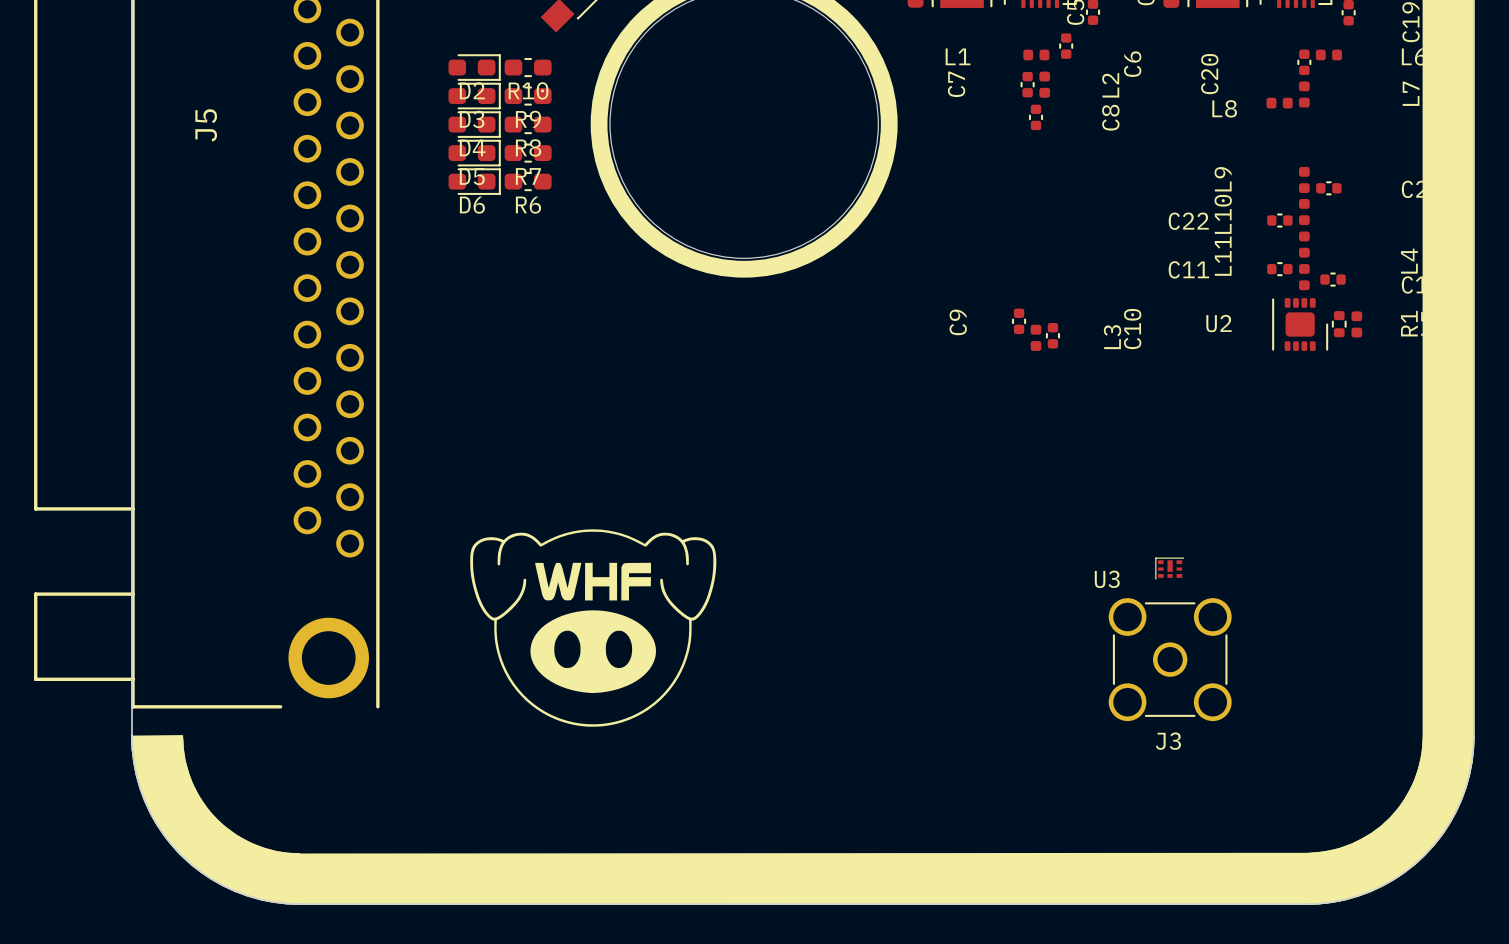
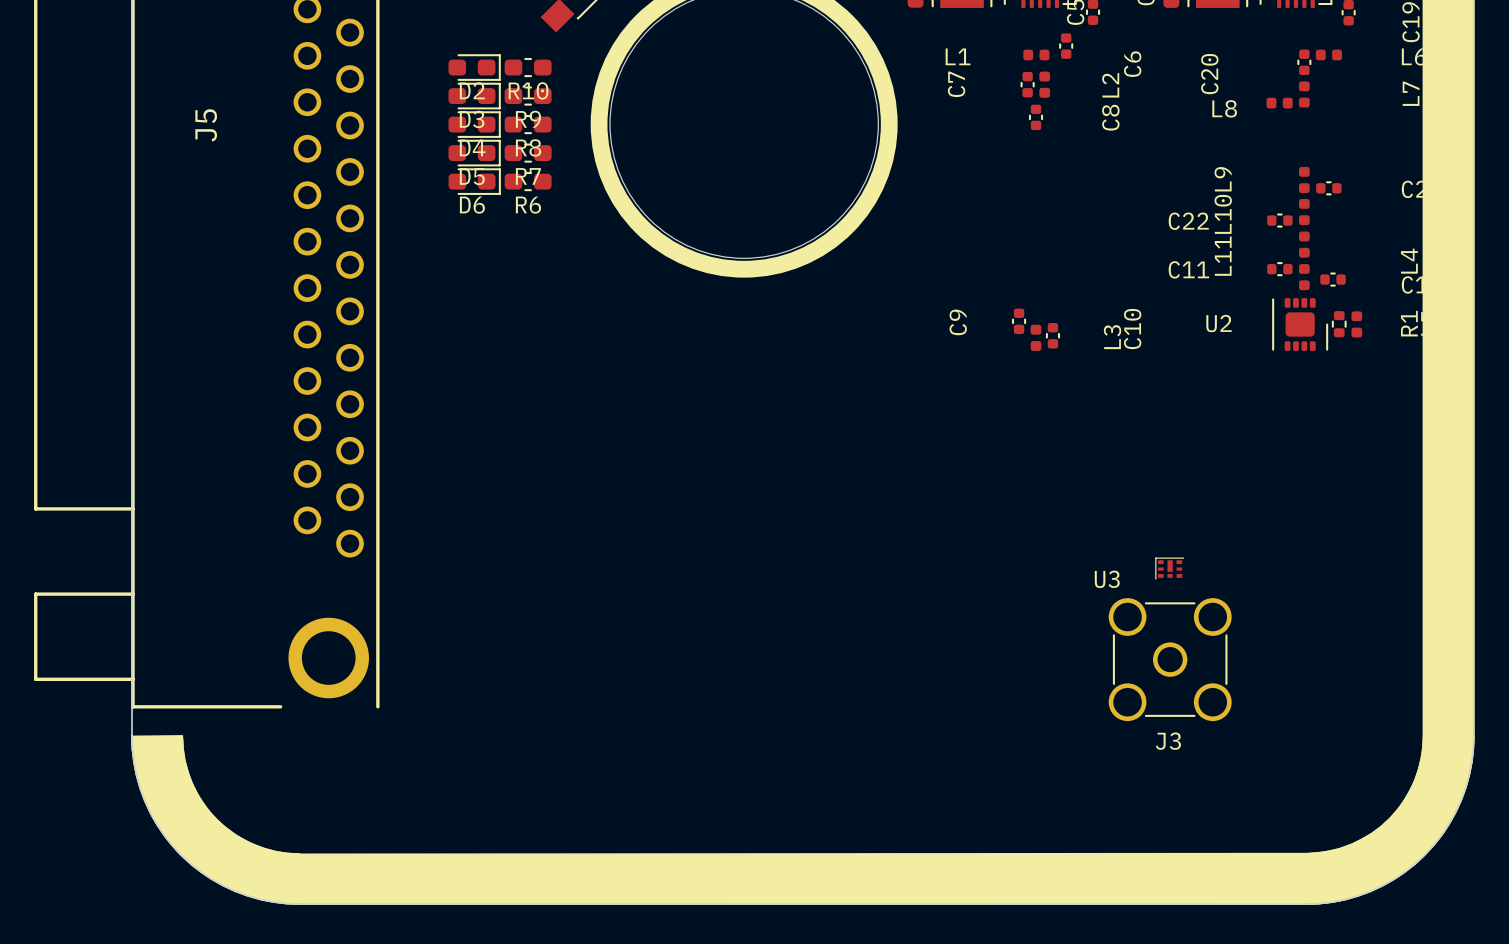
drawing: [470, 529, 717, 727] -> none

